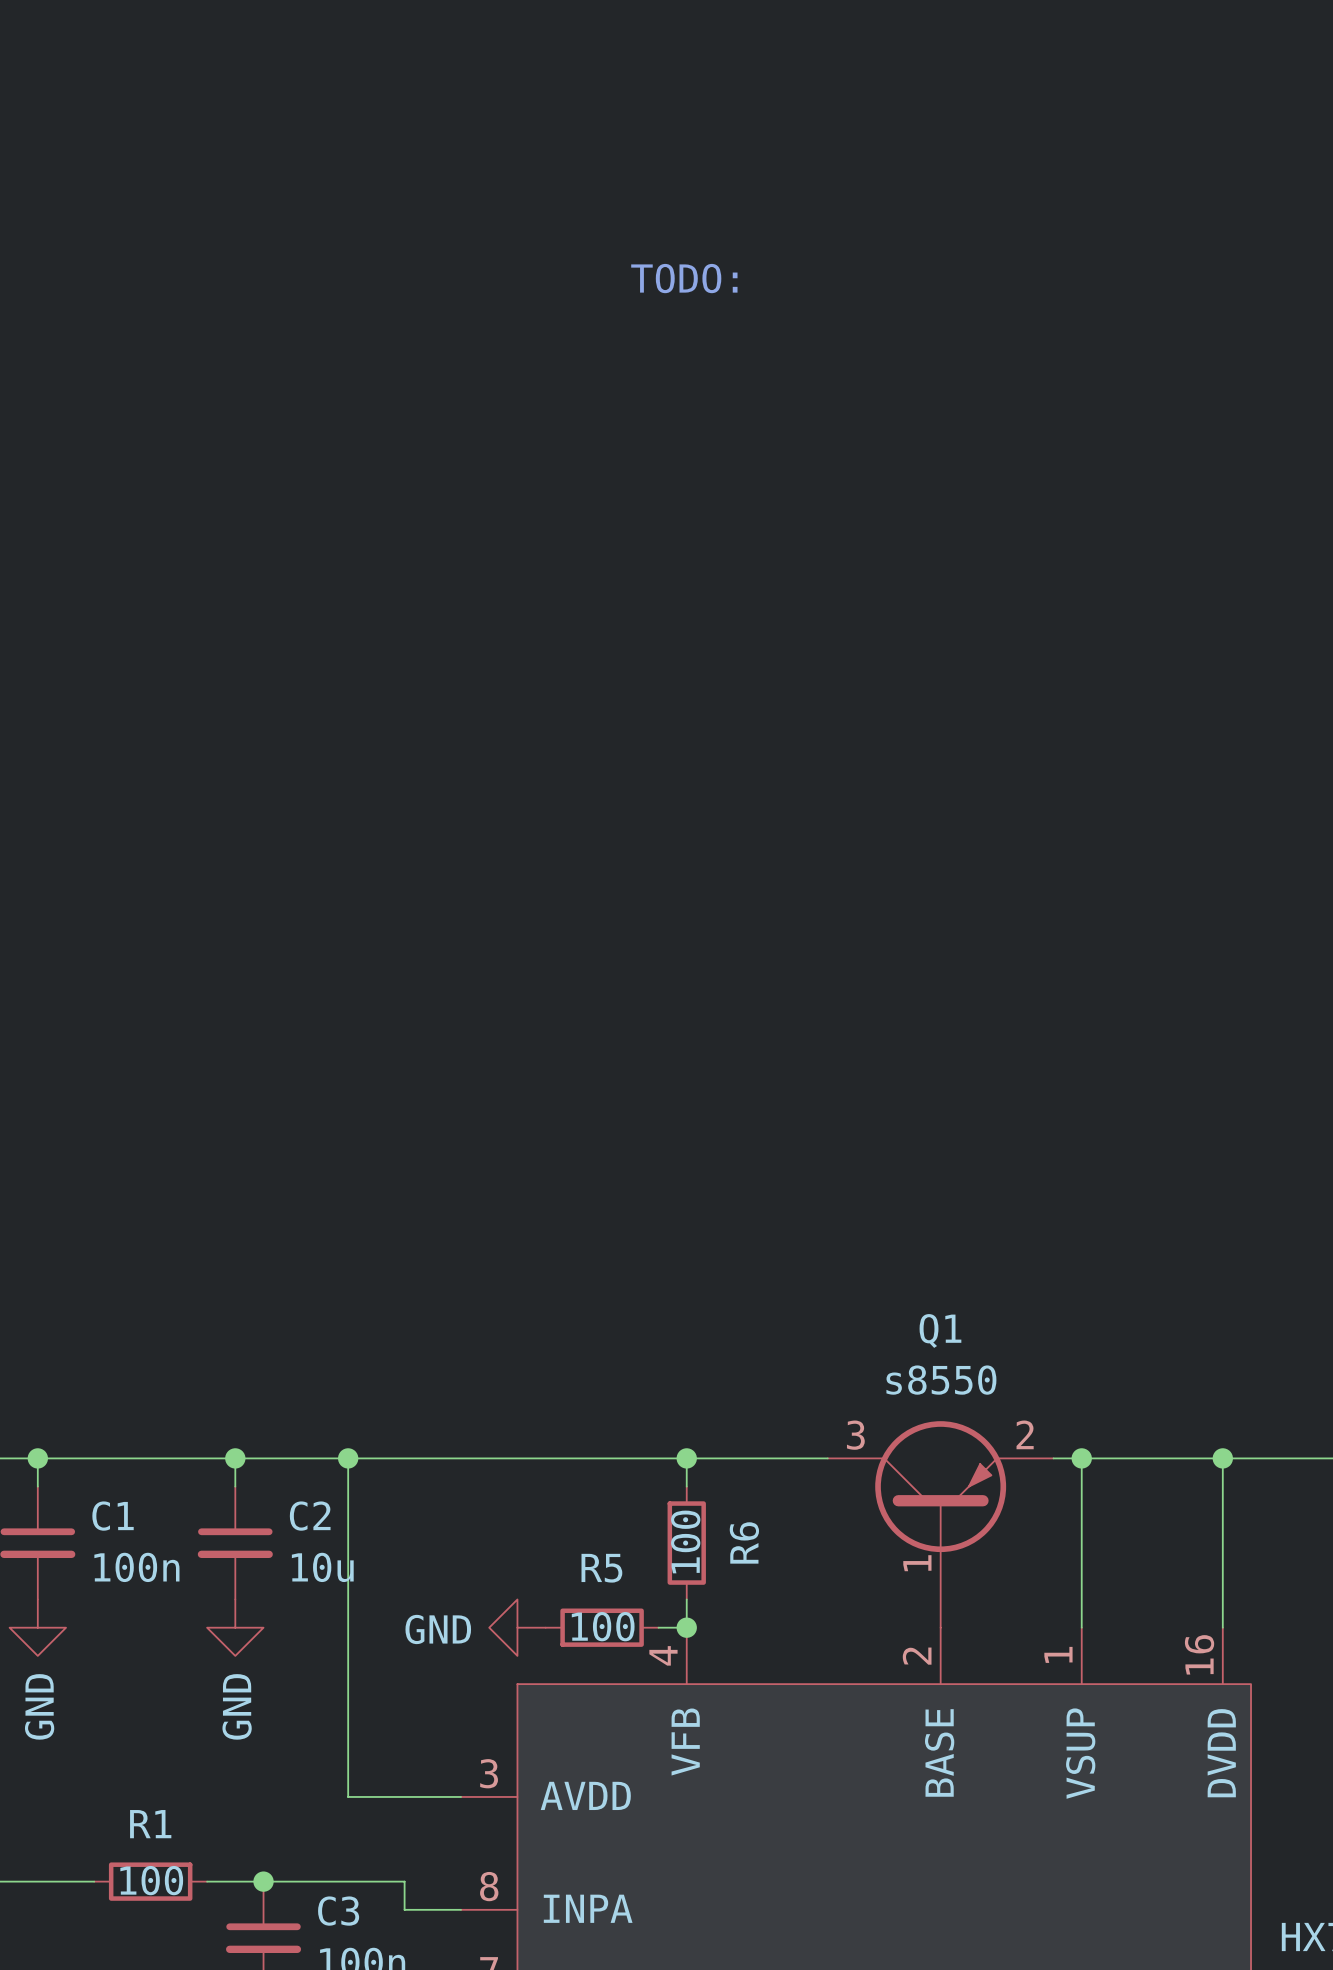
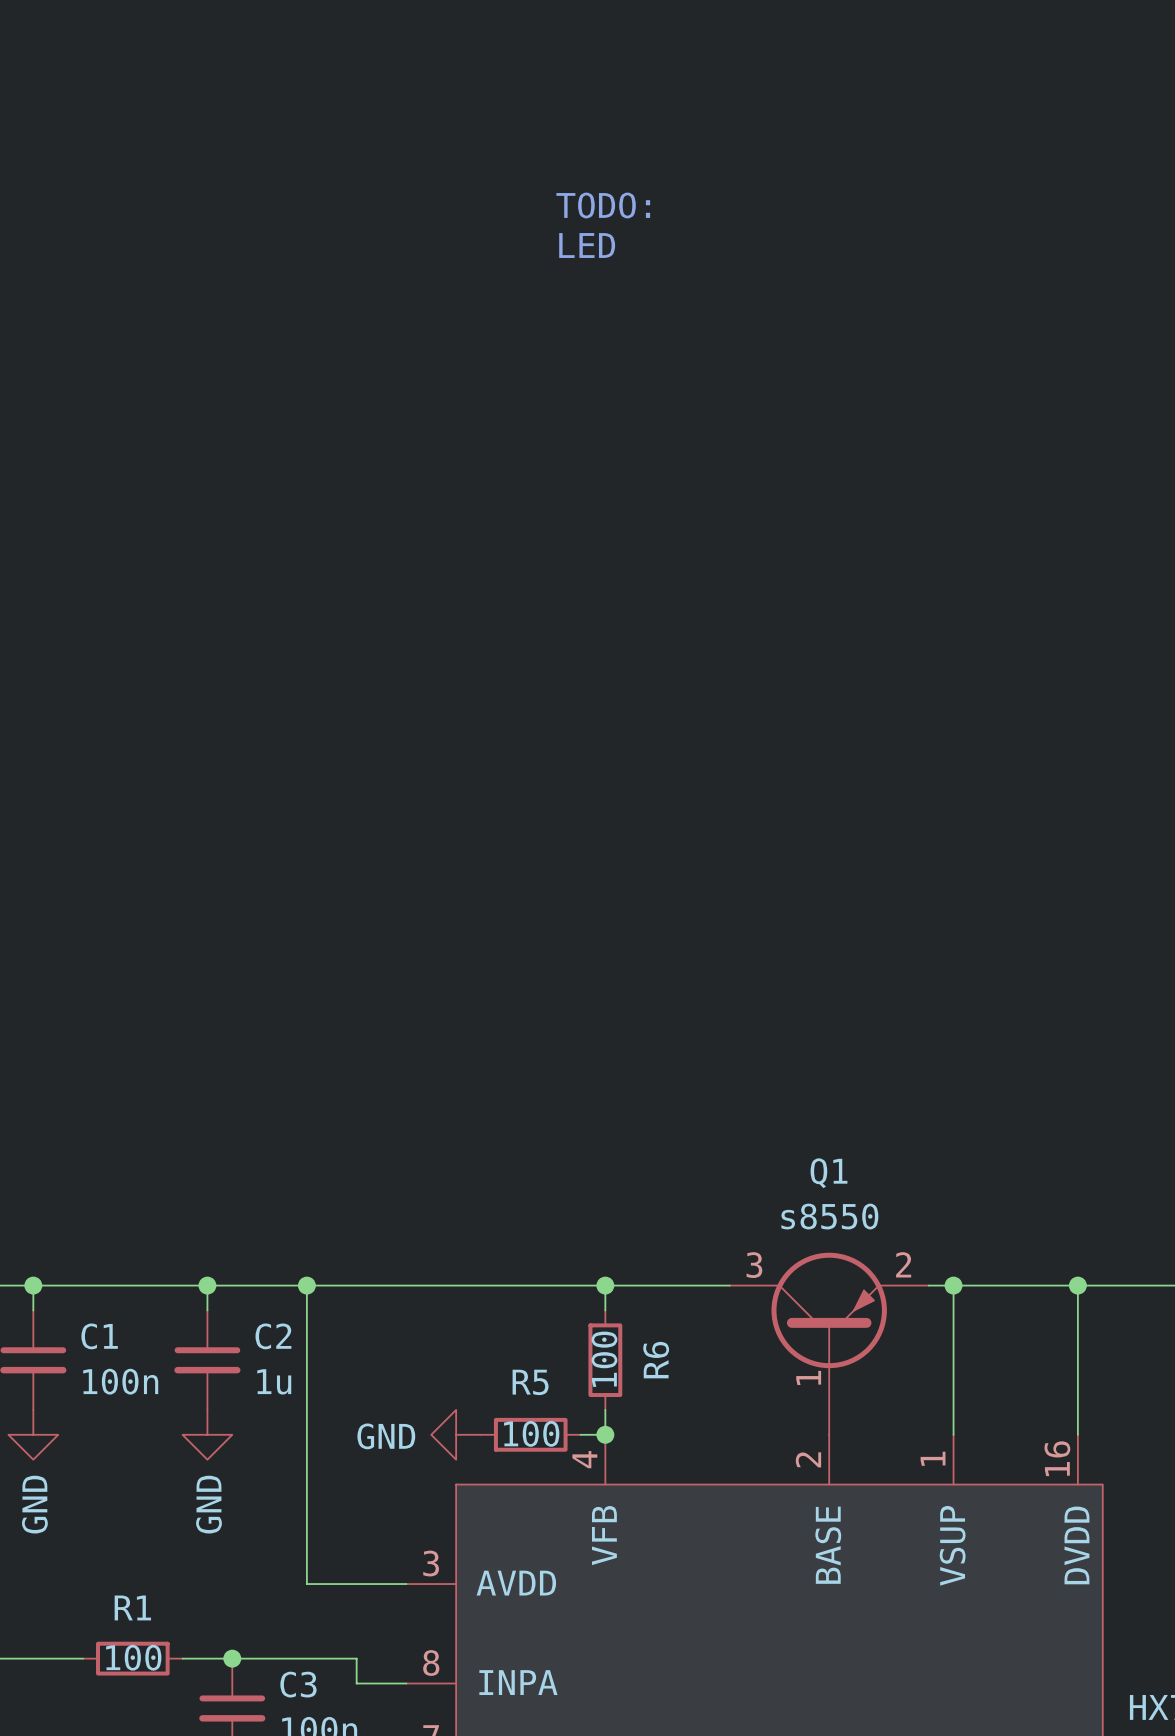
text: none -> TODO: (603, 205)
text: TODO: (684, 278) -> LED (587, 245)
C2 value: 10u (322, 1567) -> 1u (274, 1381)

